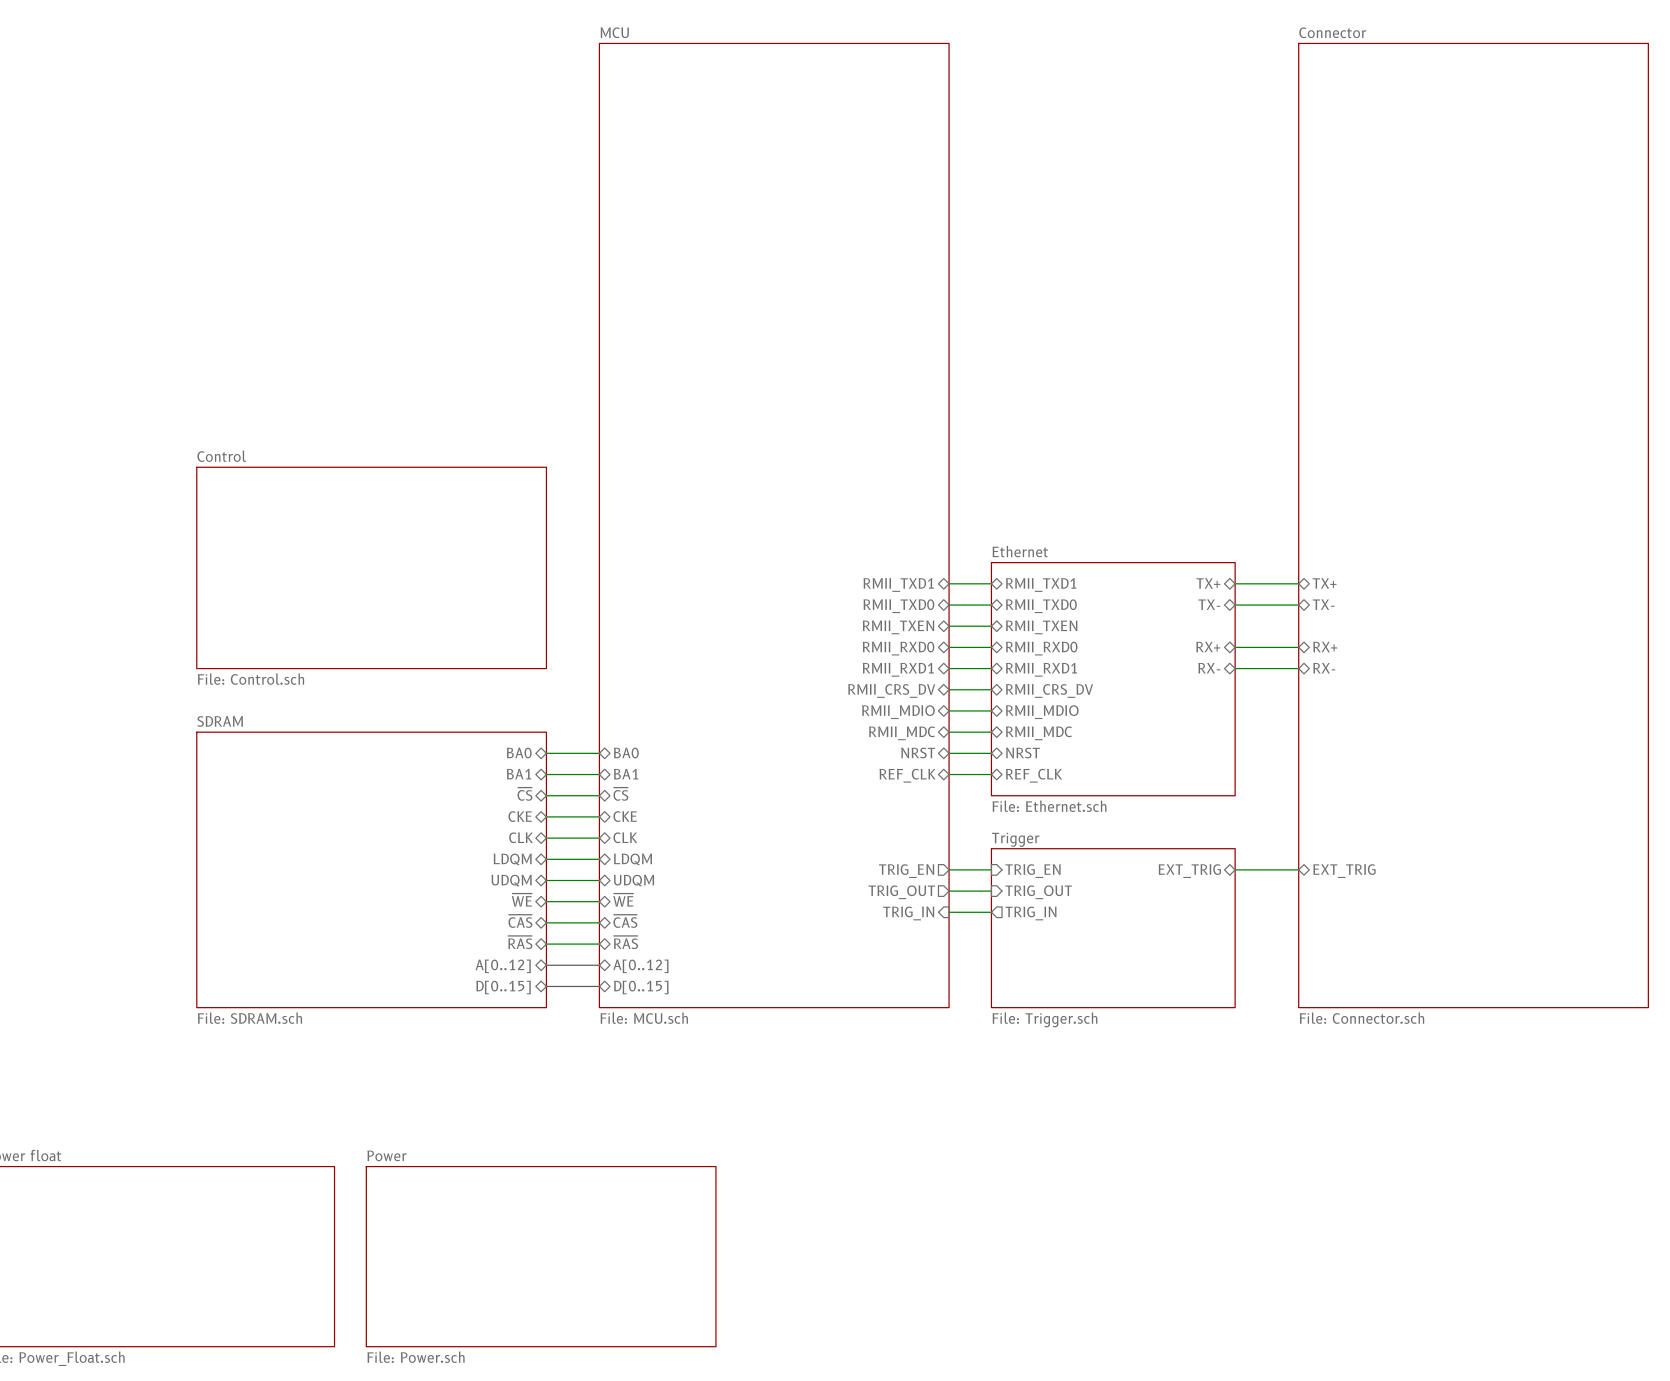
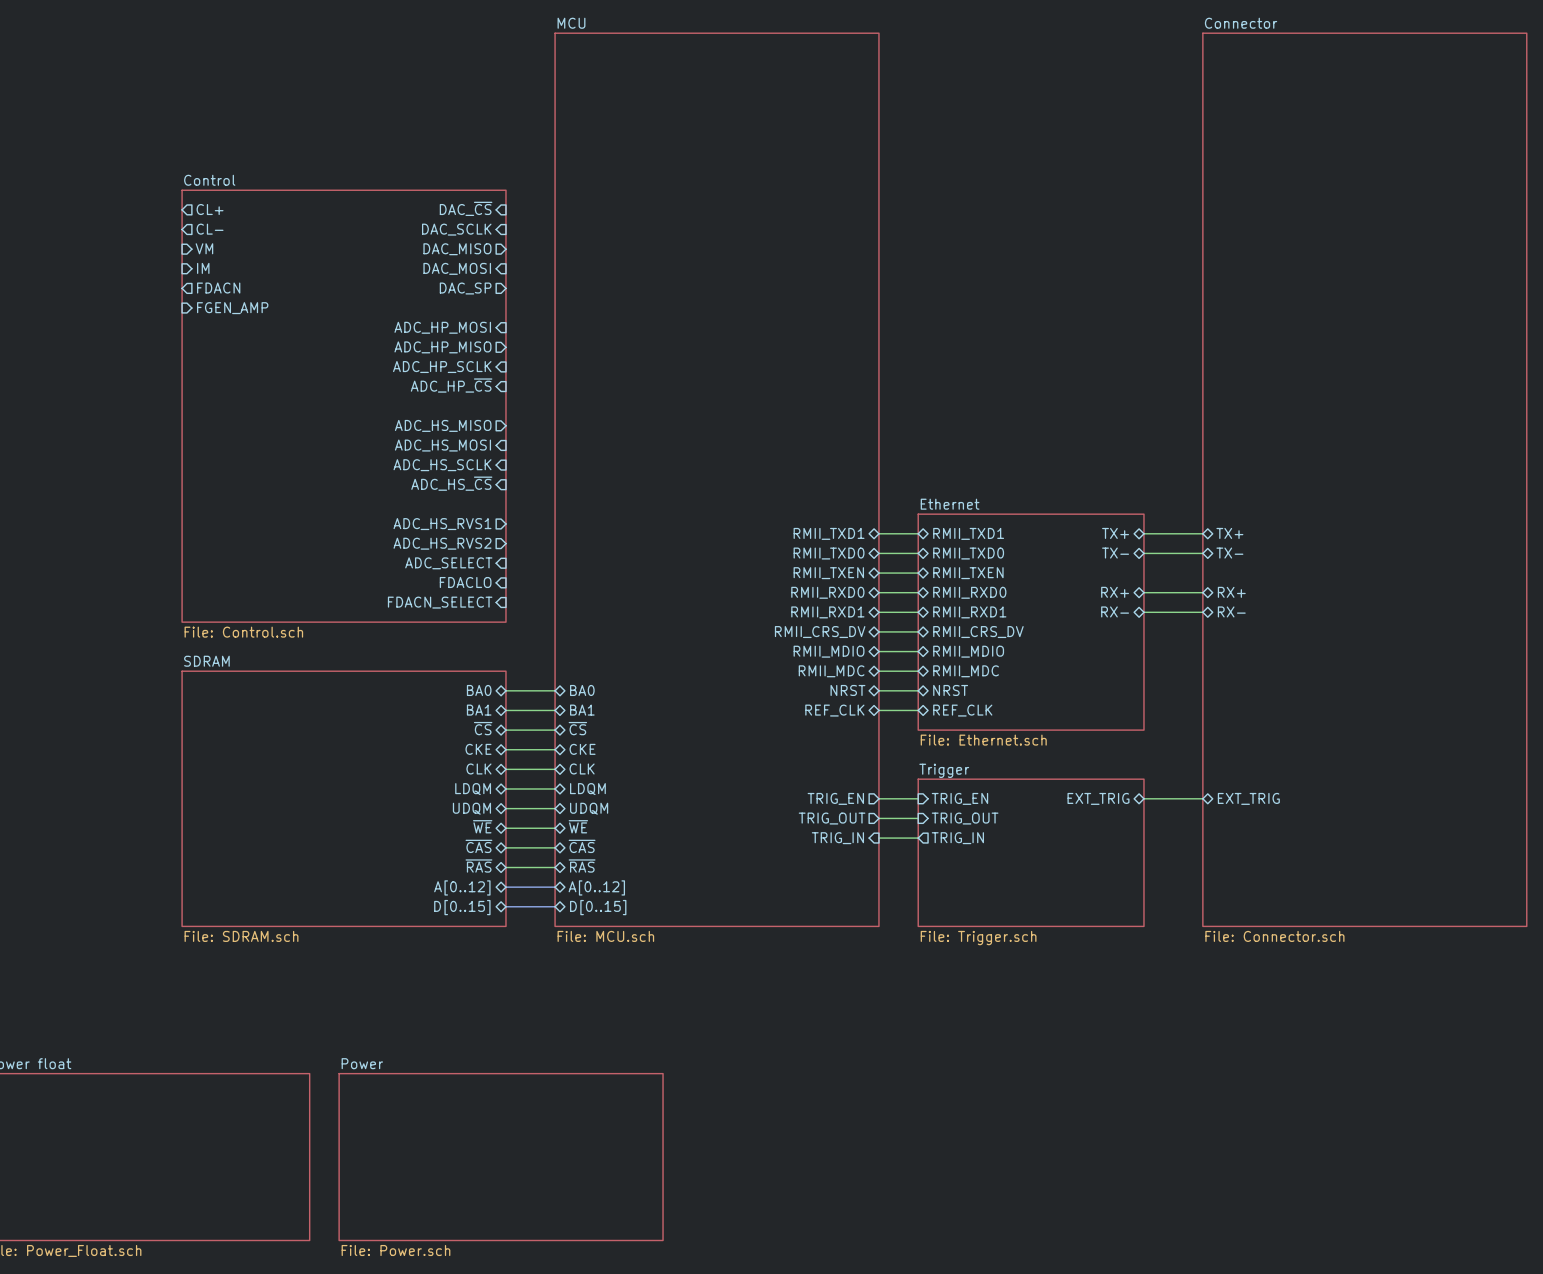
sheet pin: none -> CL+ (210, 209)
sheet pin: none -> DAC_~{CS} (466, 208)
sheet pin: none -> CL- (210, 229)
sheet pin: none -> DAC_SCLK (456, 229)
sheet pin: none -> VM (204, 248)
sheet pin: none -> DAC_MISO (457, 249)
sheet pin: none -> IM (203, 268)
sheet pin: none -> DAC_MOSI (457, 268)
sheet pin: none -> FDACN (218, 288)
sheet pin: none -> DAC_SP (465, 288)
sheet pin: none -> FGEN_AMP (232, 308)
sheet pin: none -> ADC_HP_MOSI (442, 327)
sheet pin: none -> ADC_HP_MISO (442, 347)
sheet pin: none -> ADC_HP_SCLK (442, 367)
sheet pin: none -> ADC_HP_~{CS} (451, 385)
sheet Control: none -> File: Control.sch (344, 406)
sheet pin: none -> ADC_HS_MISO (443, 425)
sheet pin: none -> ADC_HS_MOSI (442, 445)
sheet pin: none -> ADC_HS_SCLK (442, 465)
sheet pin: none -> ADC_HS_~{CS} (451, 483)
sheet Control: File: Control.sch (371, 567) -> none
sheet pin: none -> ADC_HS_RVS1 (442, 524)
sheet pin: none -> ADC_HS_RVS2 (442, 543)
sheet pin: none -> ADC_SELECT (448, 563)
sheet pin: none -> FDACLO (465, 582)
sheet pin: none -> FDACN_SELECT (440, 602)

